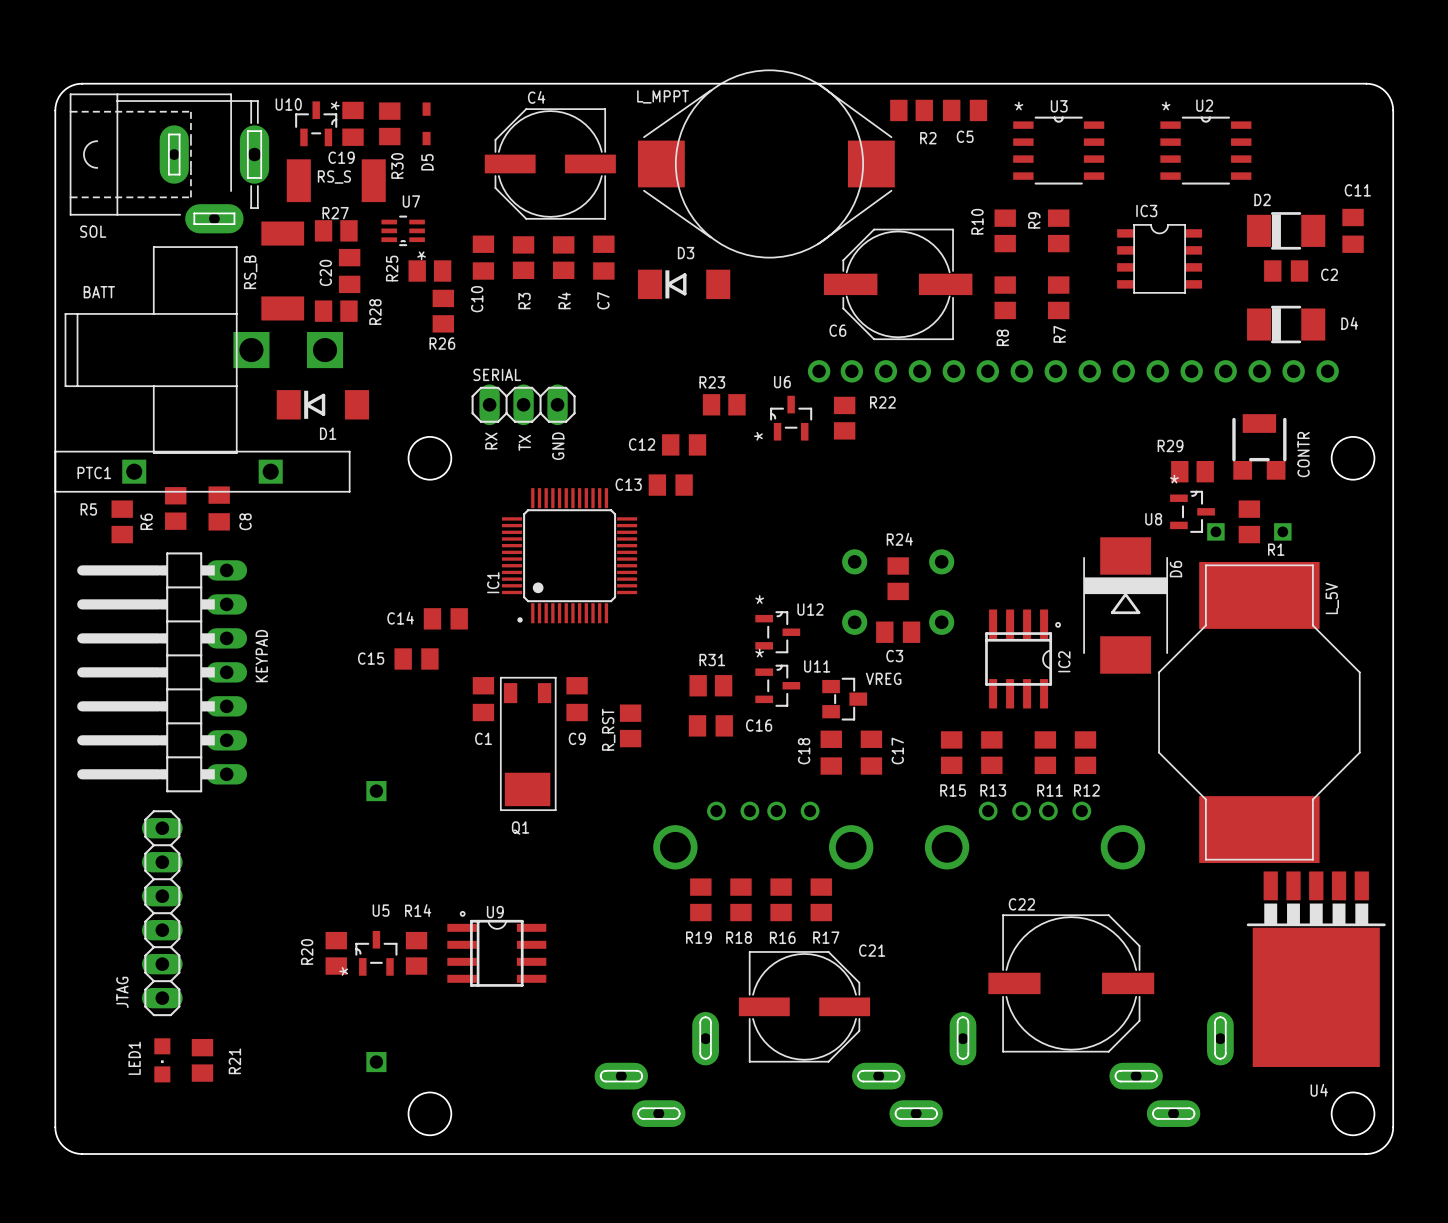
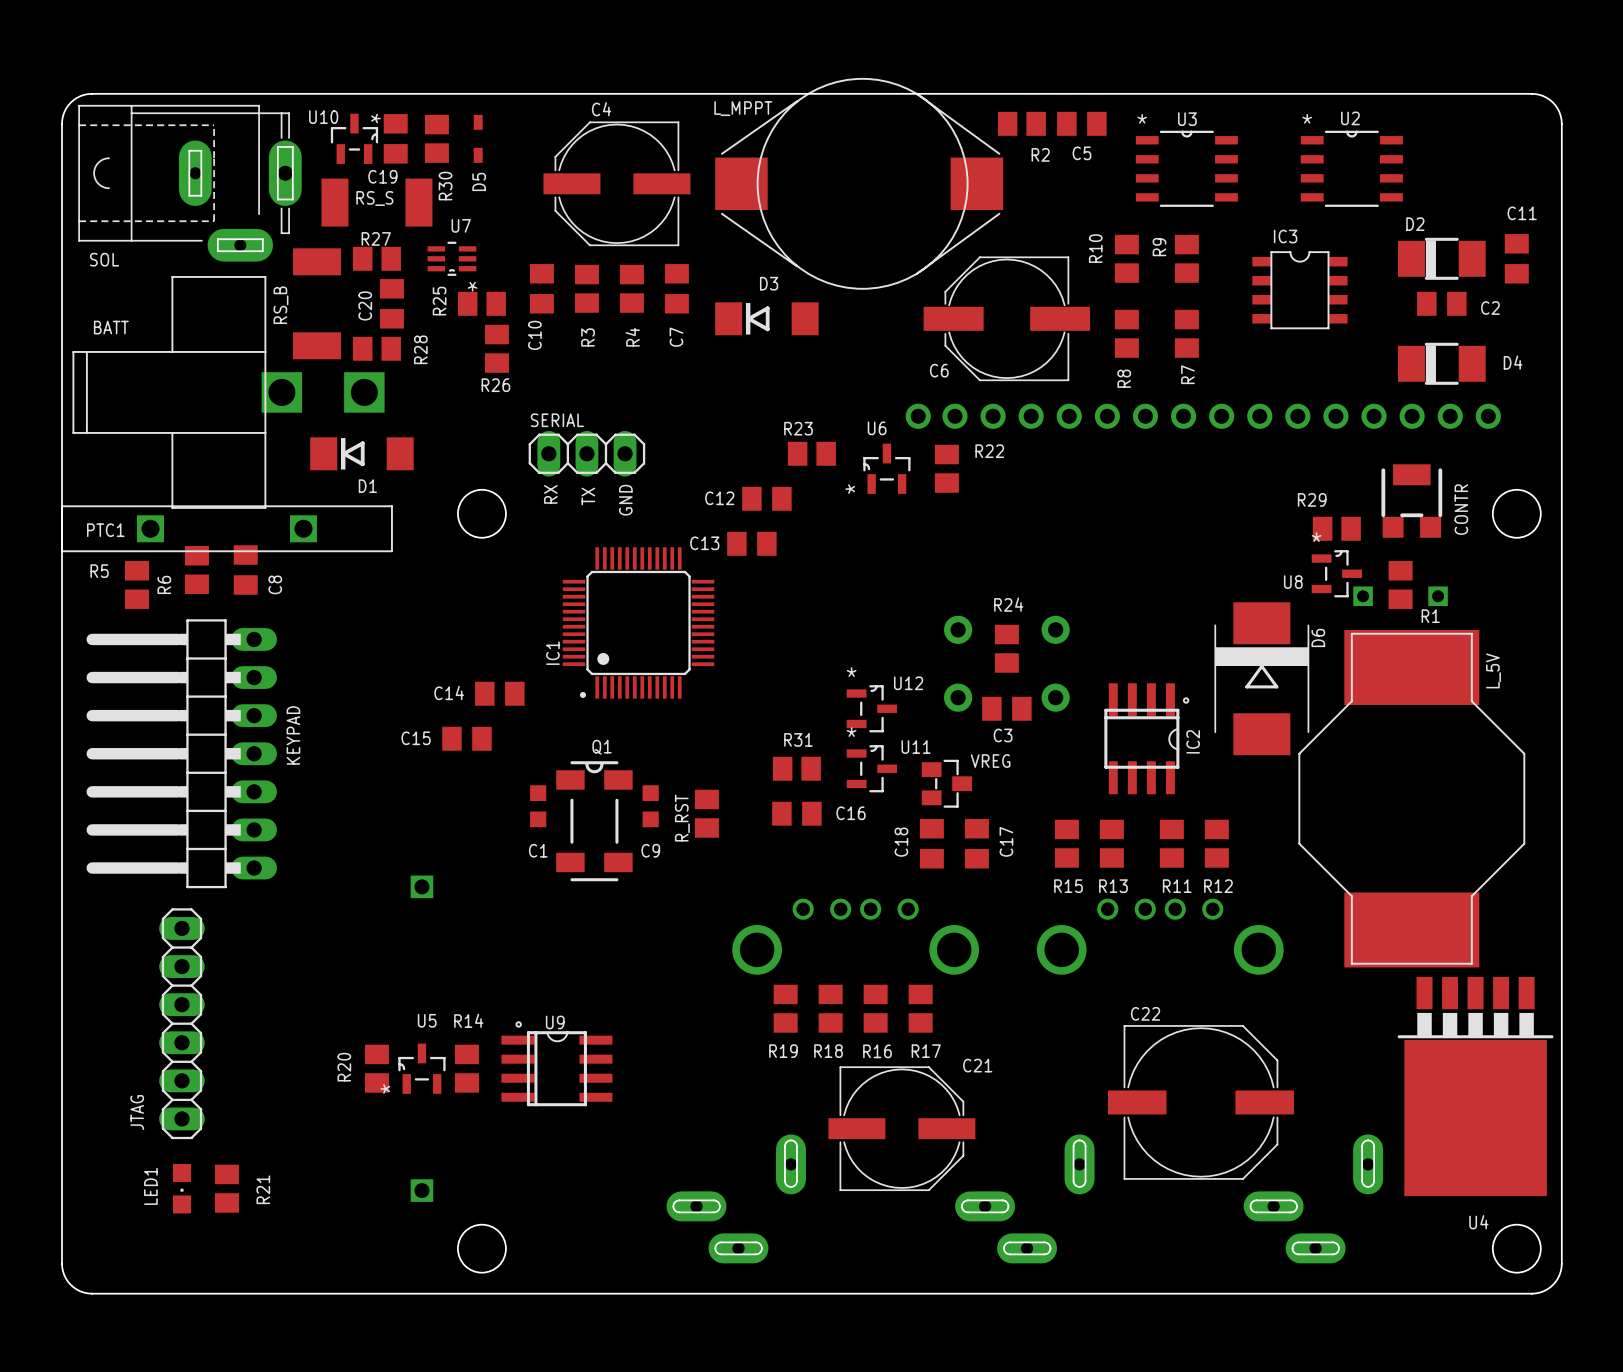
Q1 footprint: [499, 676, 557, 812] -> [556, 761, 633, 882]
C1 footprint: [472, 677, 495, 722] -> [530, 785, 547, 828]
C9 footprint: [566, 677, 588, 722] -> [642, 785, 659, 828]
Q1 name position: Q1 (520, 827) -> Q1 (602, 747)

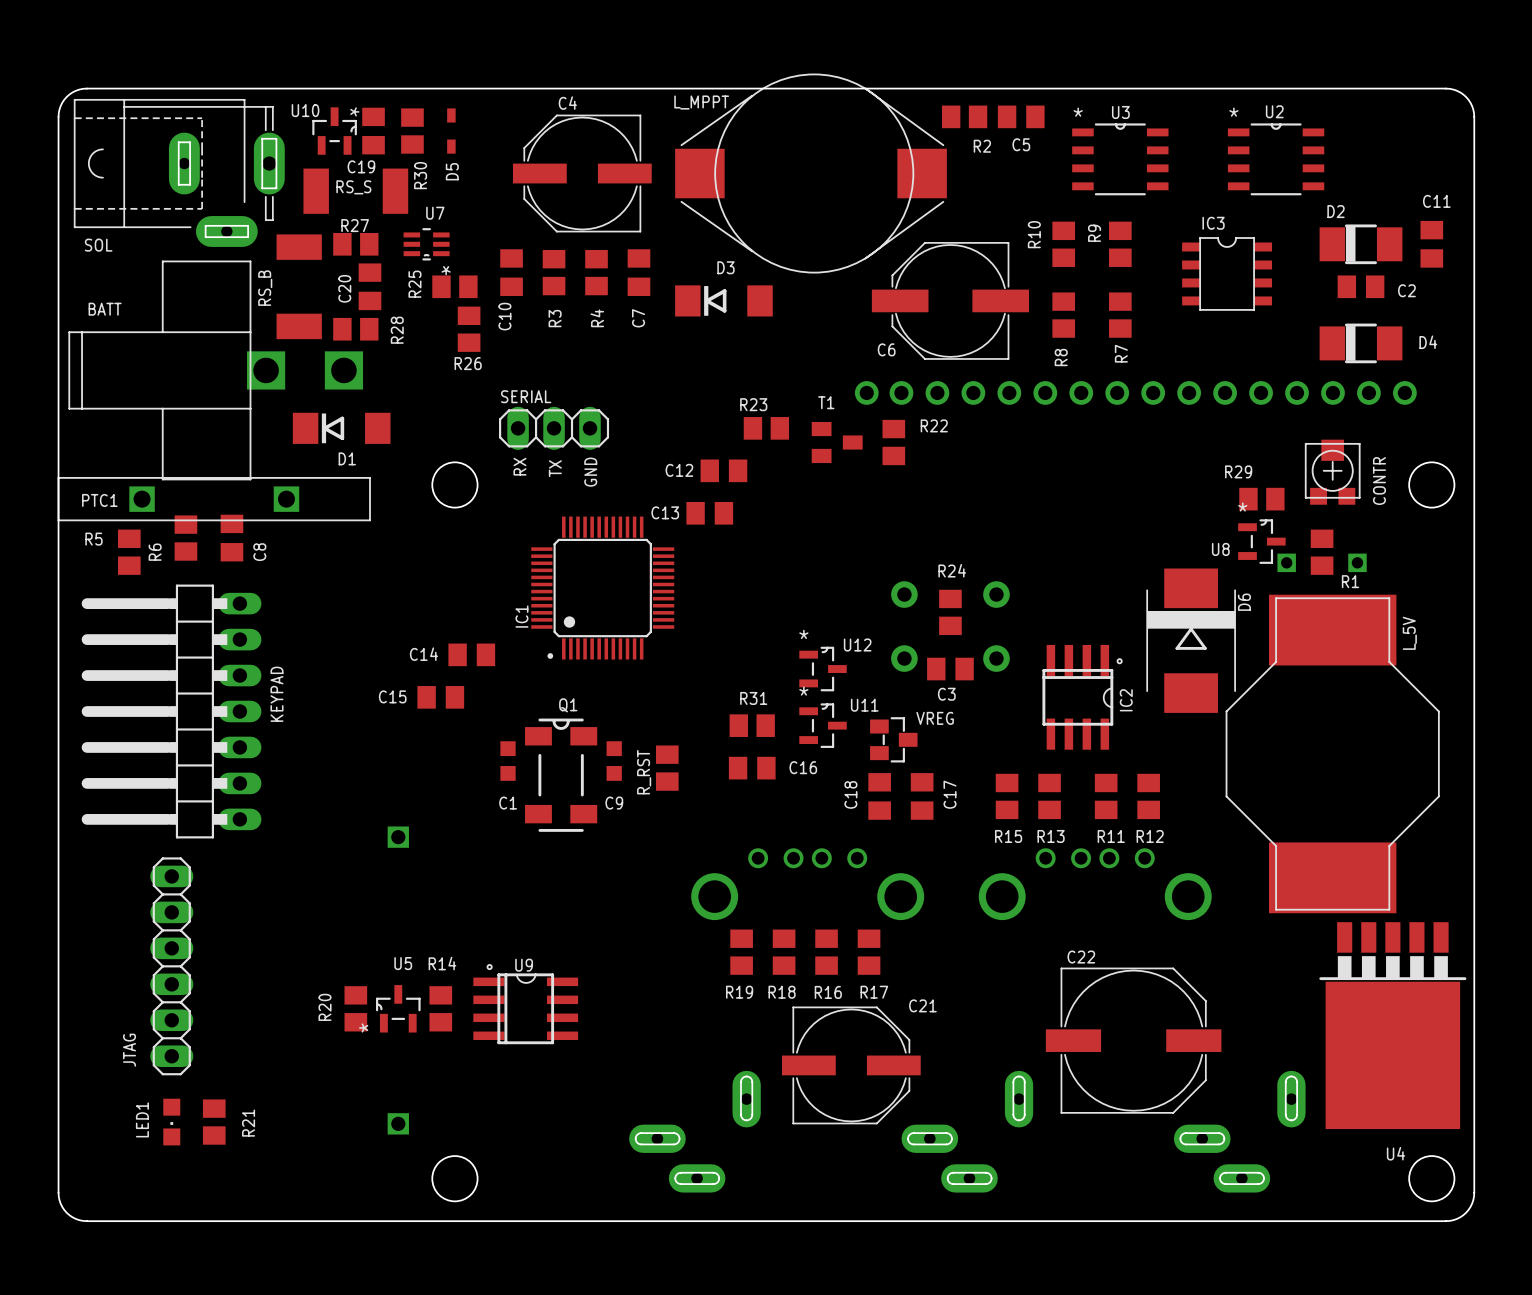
CONTR footprint: [1381, 464, 1443, 538] -> [1304, 439, 1361, 505]
U6: (886, 468) -> none
T1: none -> (837, 442)

